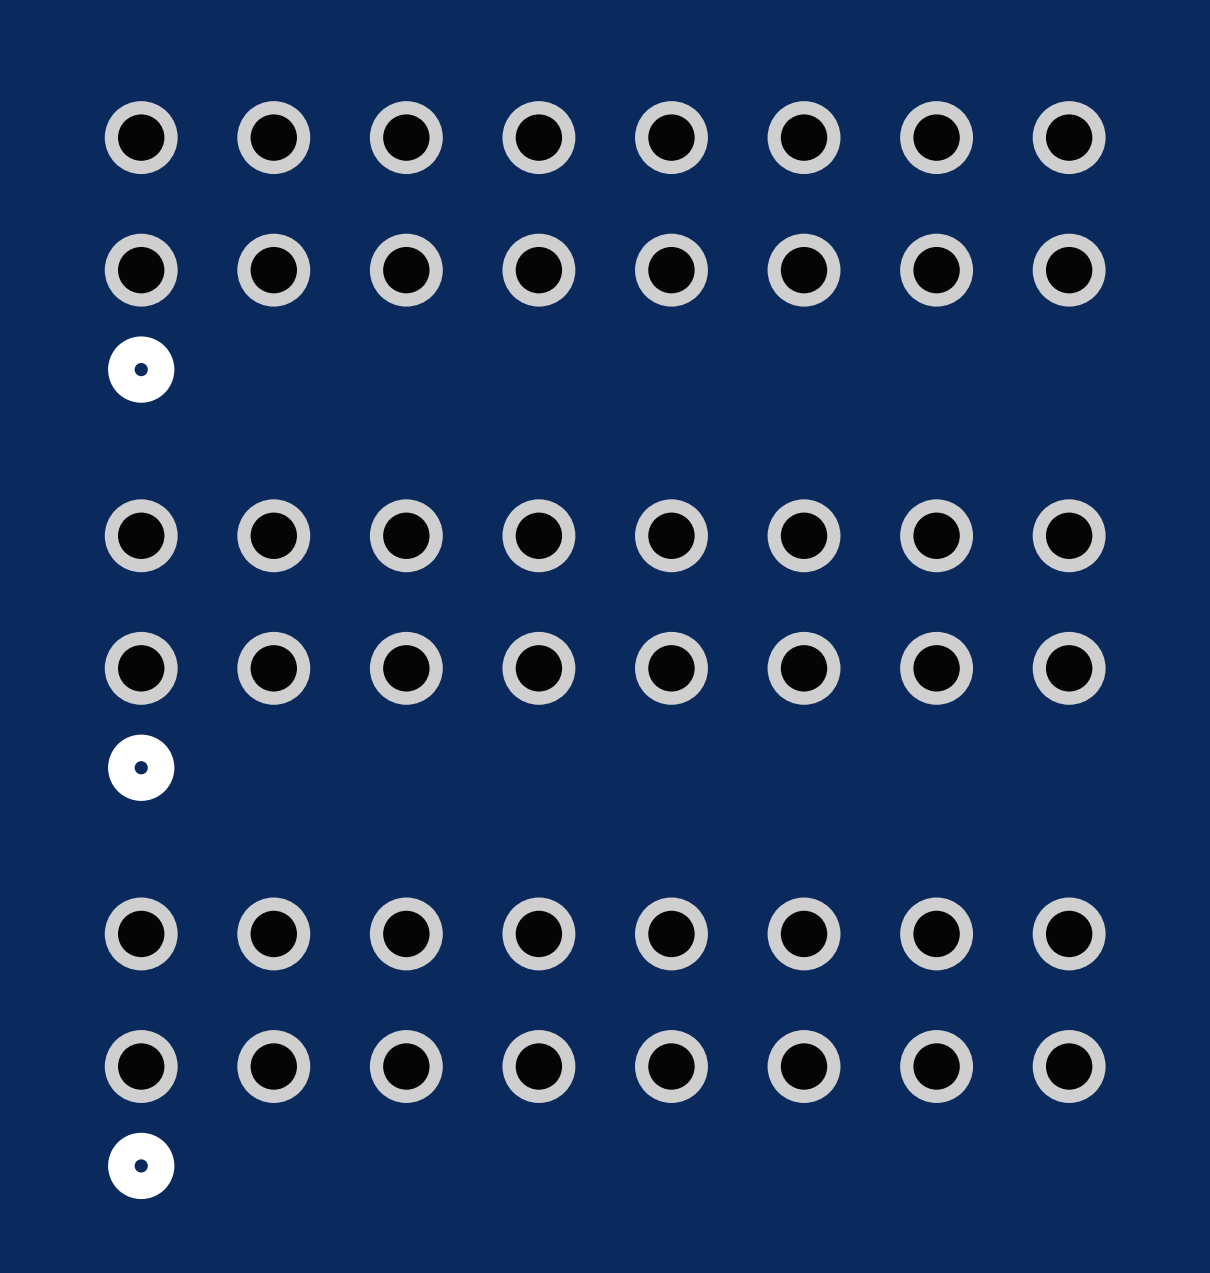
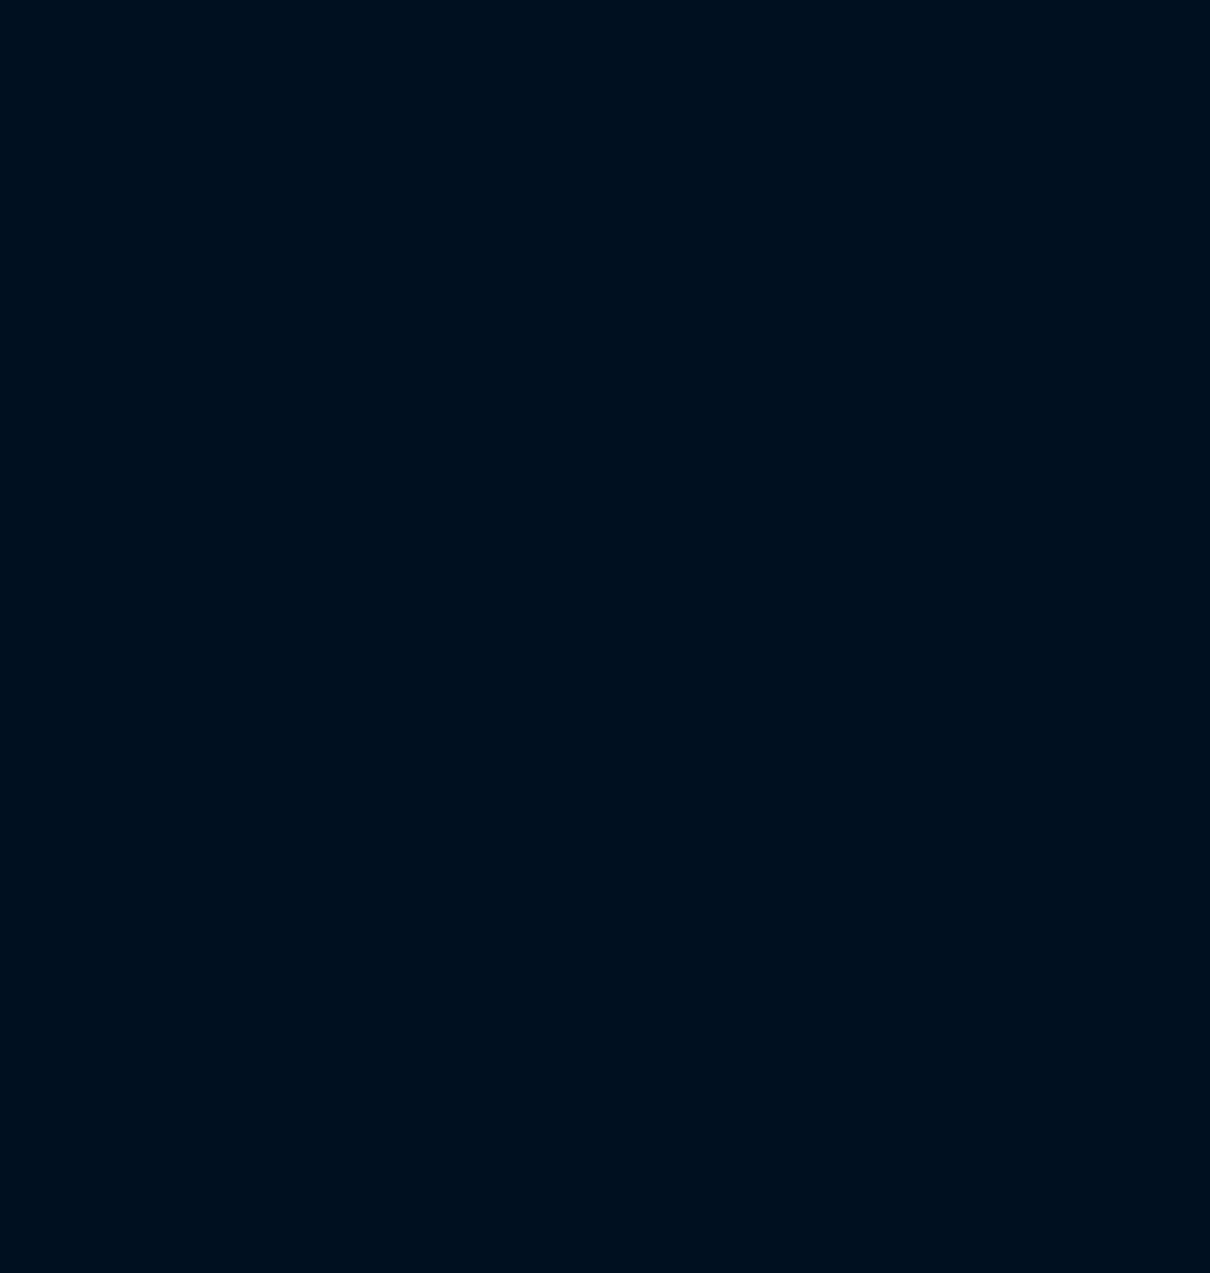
part: (605, 251) -> none
part: (605, 650) -> none
part: (605, 1048) -> none

